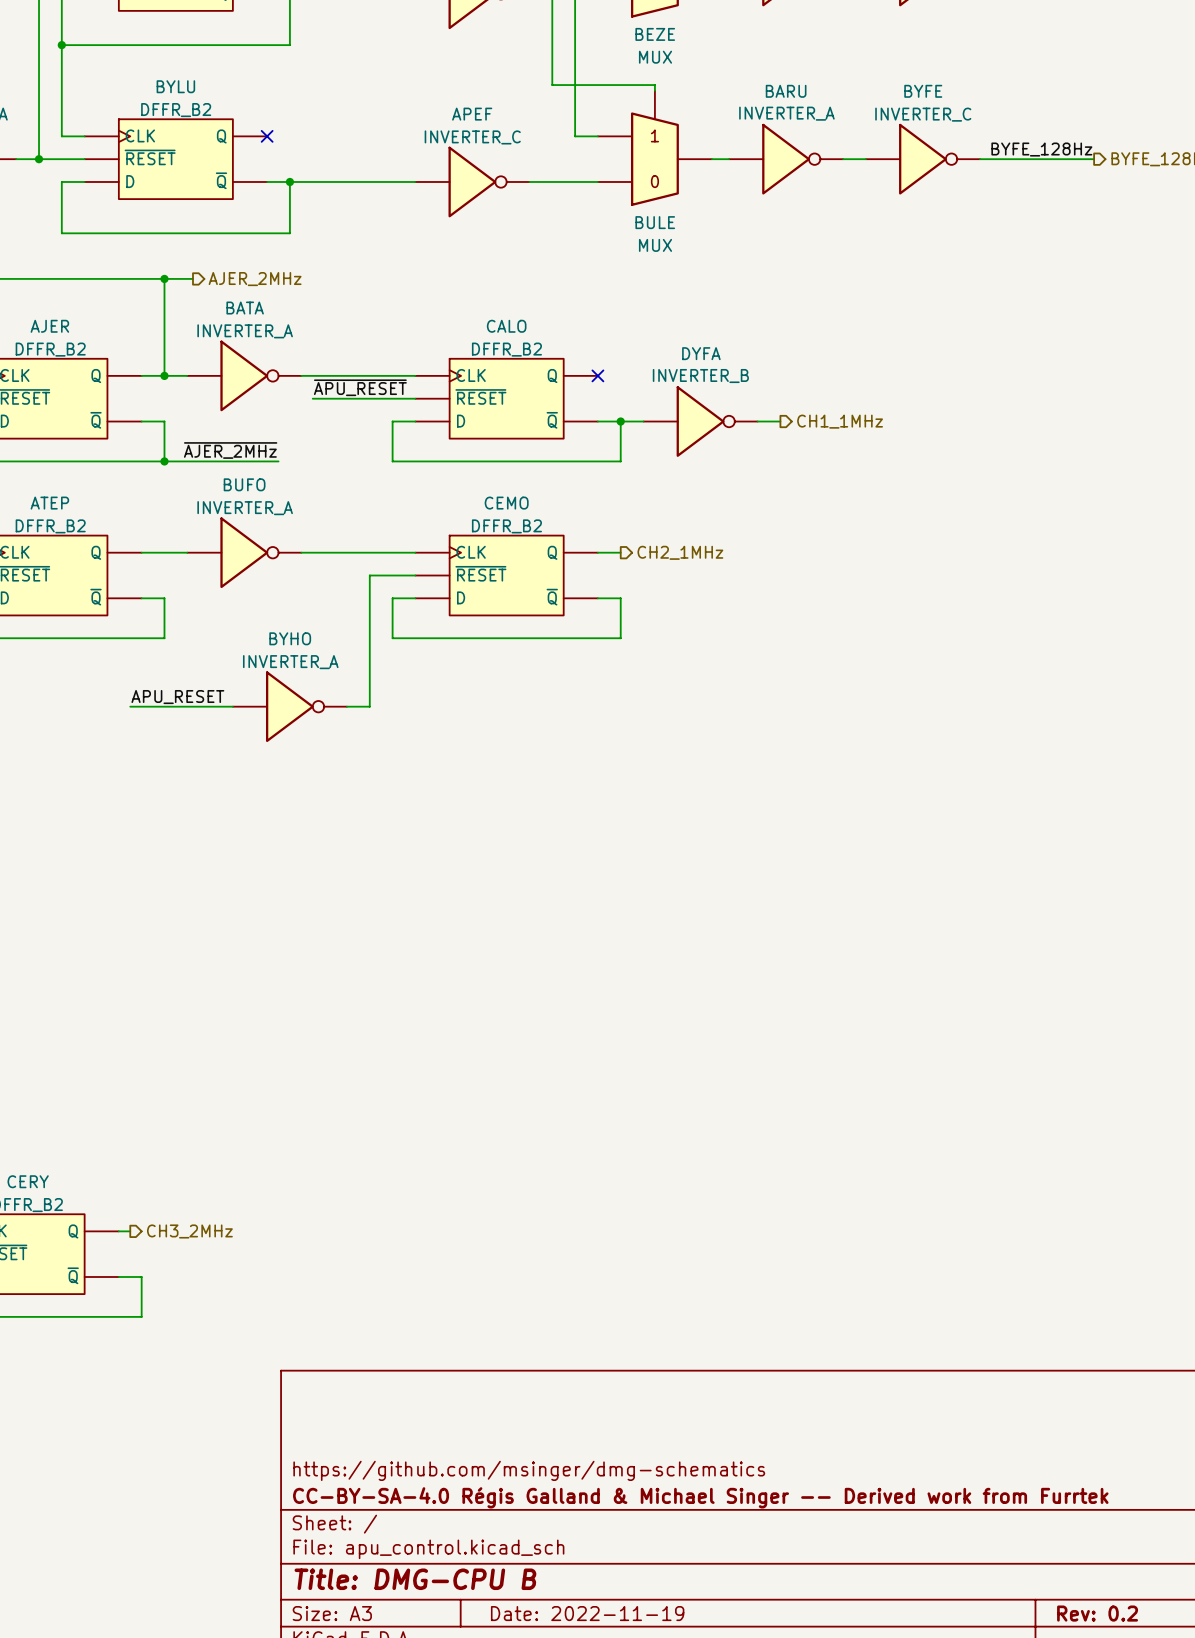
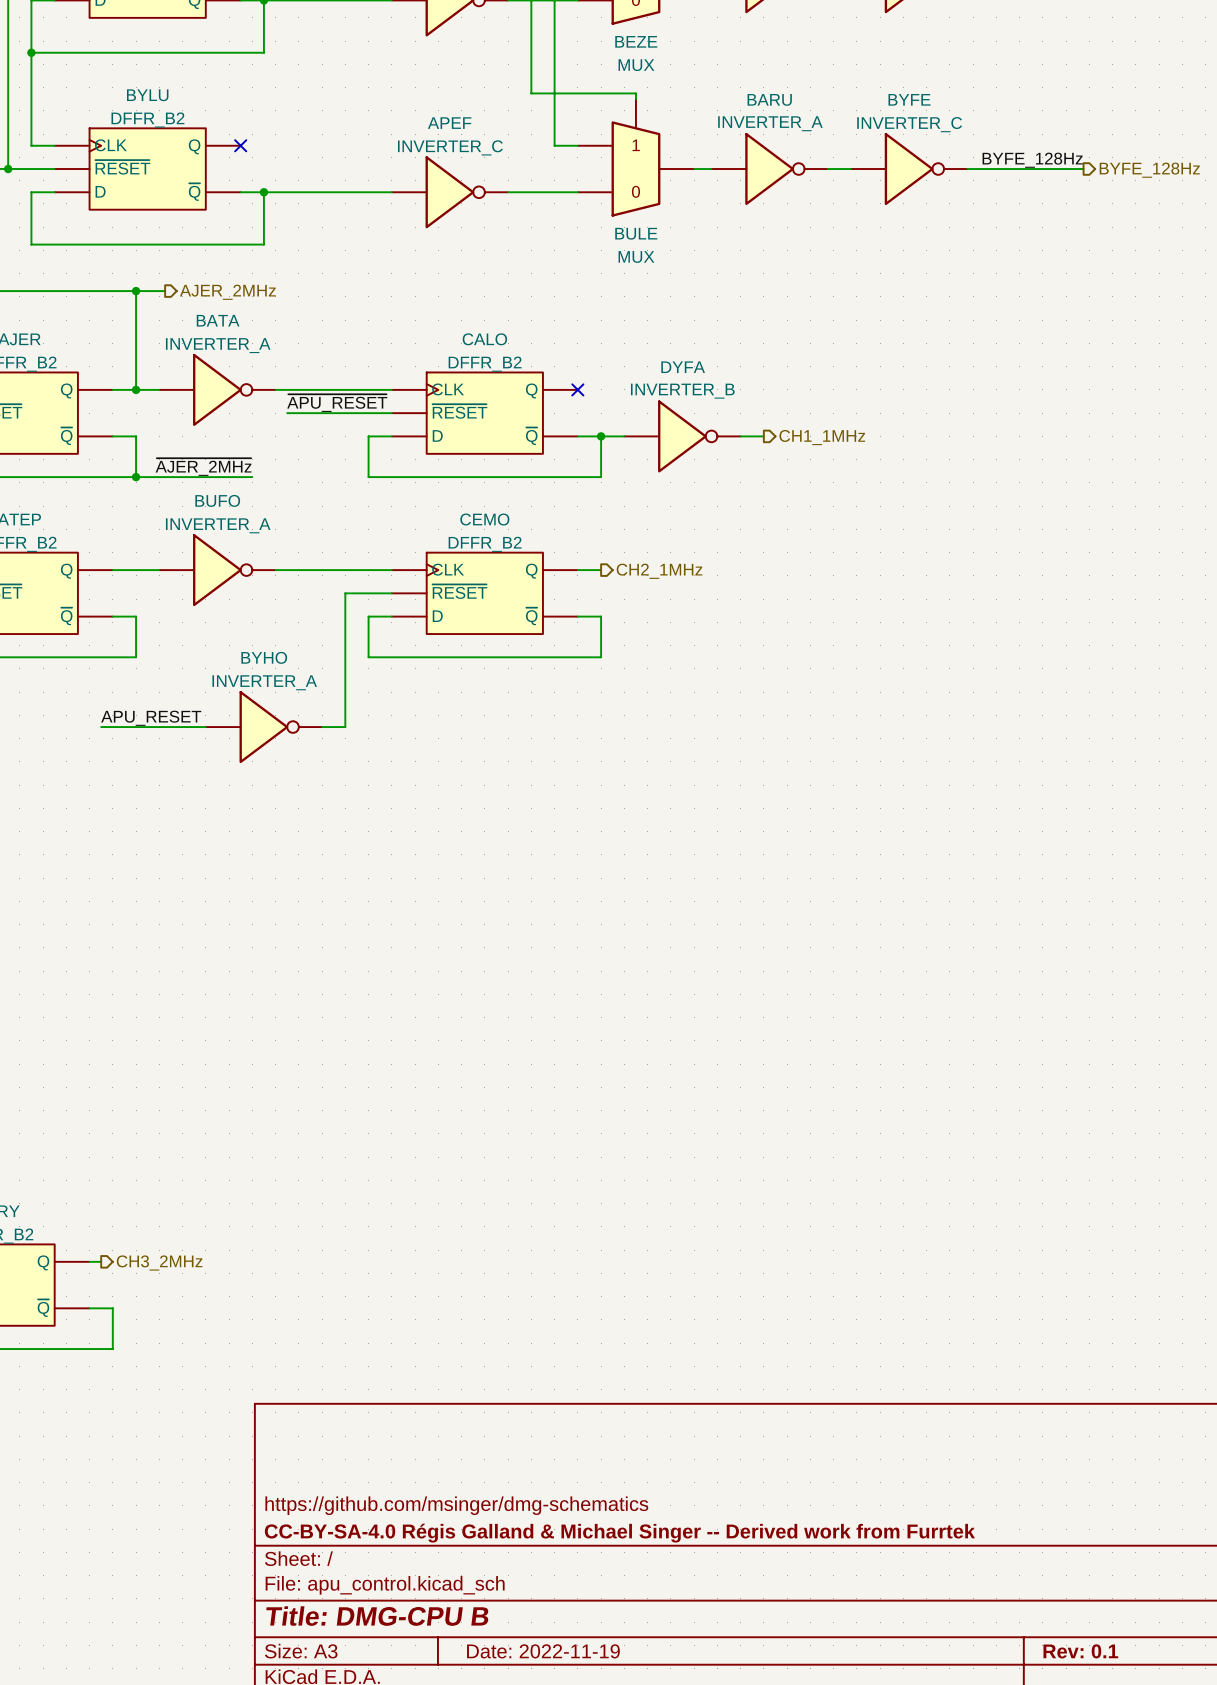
title block: Rev: 0.2 (1097, 1613) -> Rev: 0.1 (1080, 1651)

